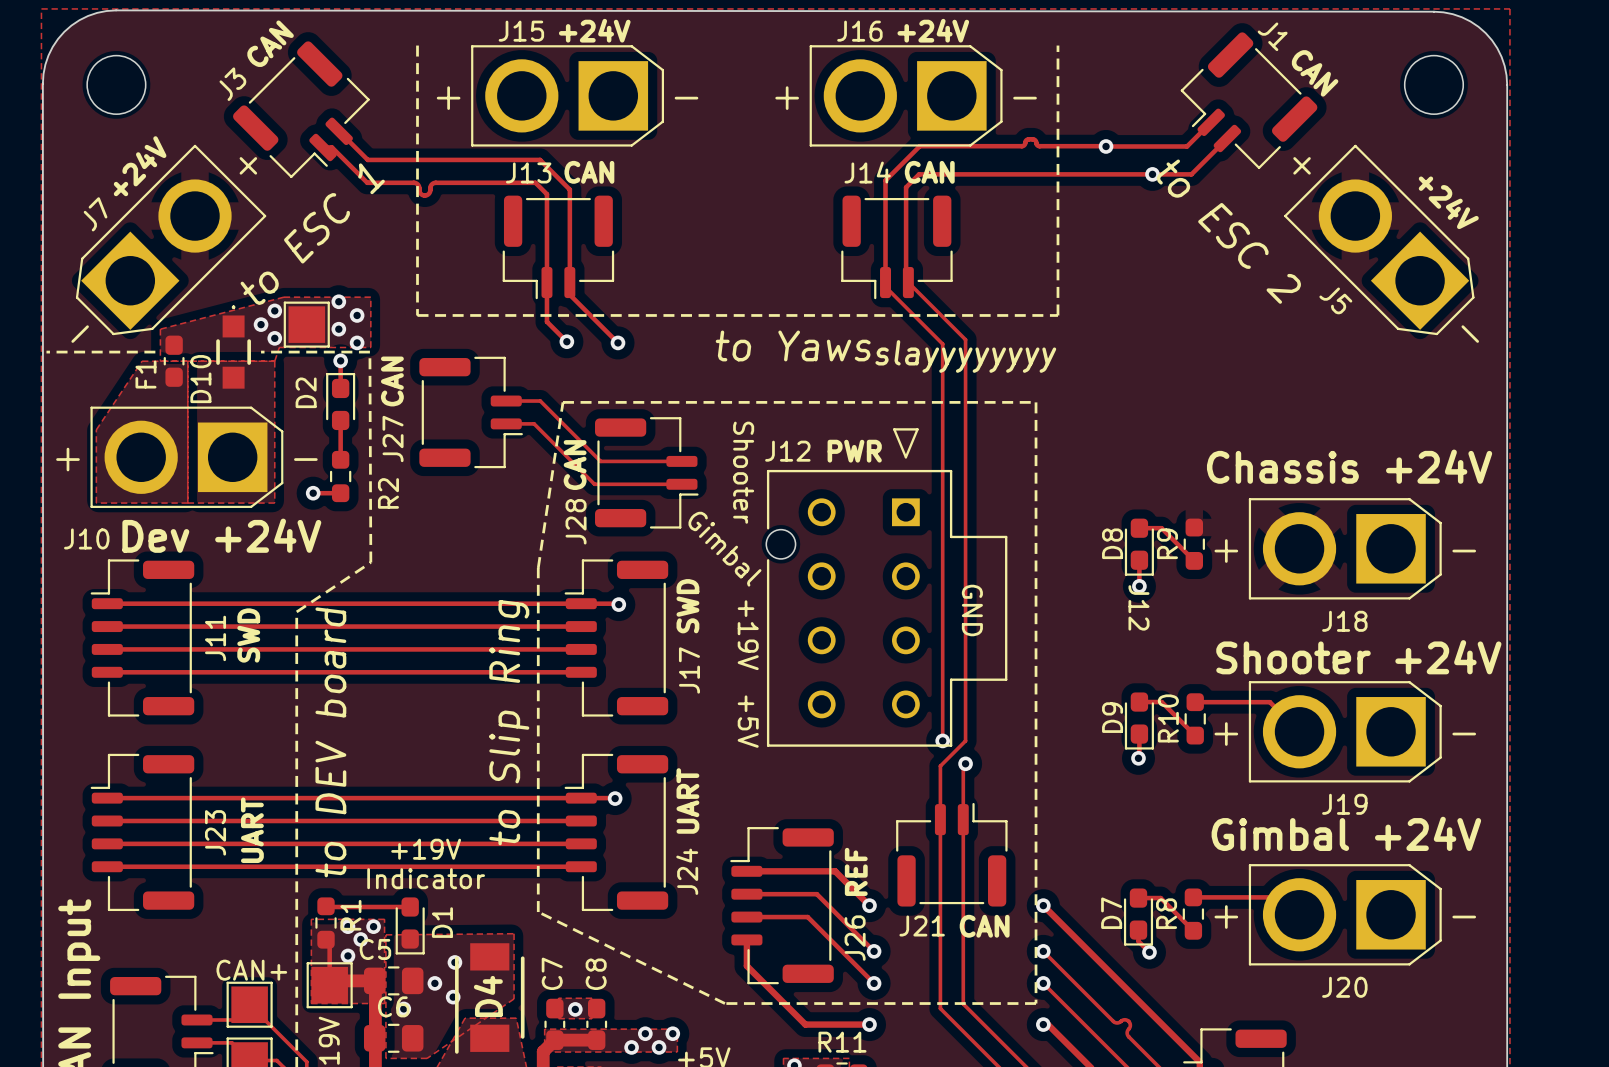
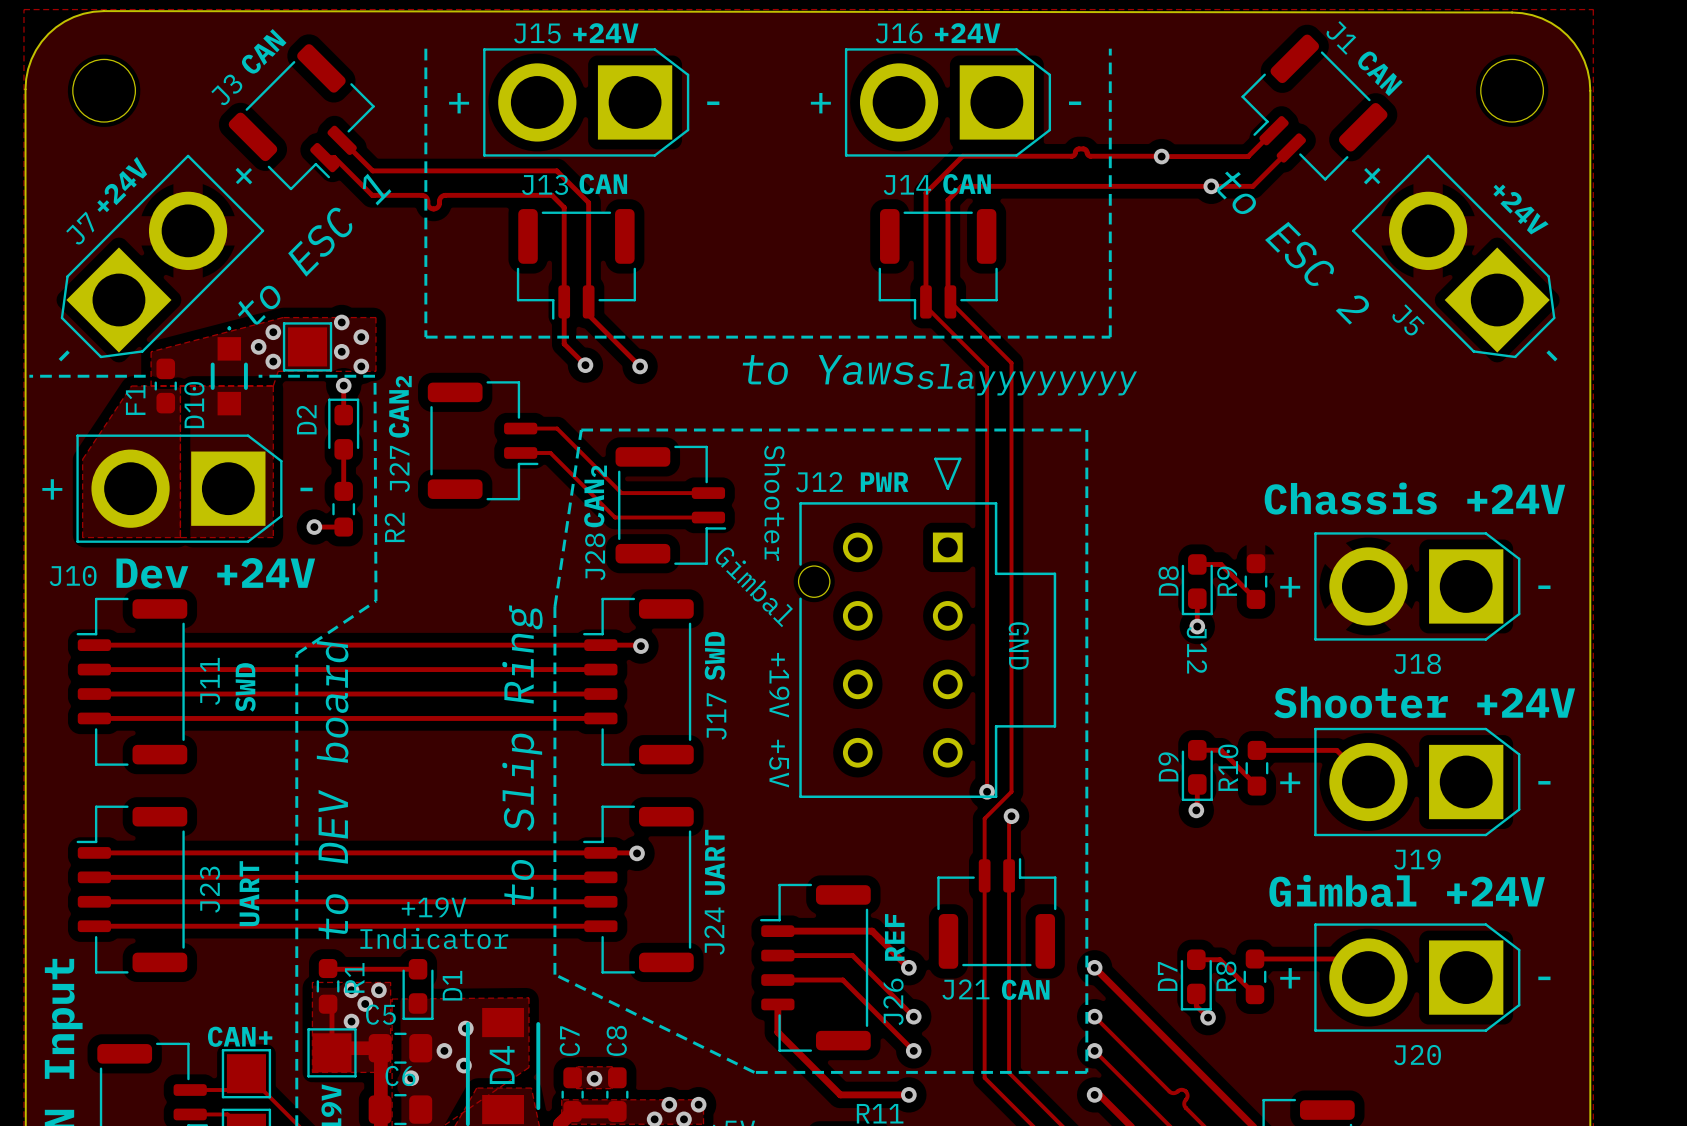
text: CAN (392, 381) -> CAN2 (400, 406)
text: CAN (575, 465) -> CAN2 (595, 496)

